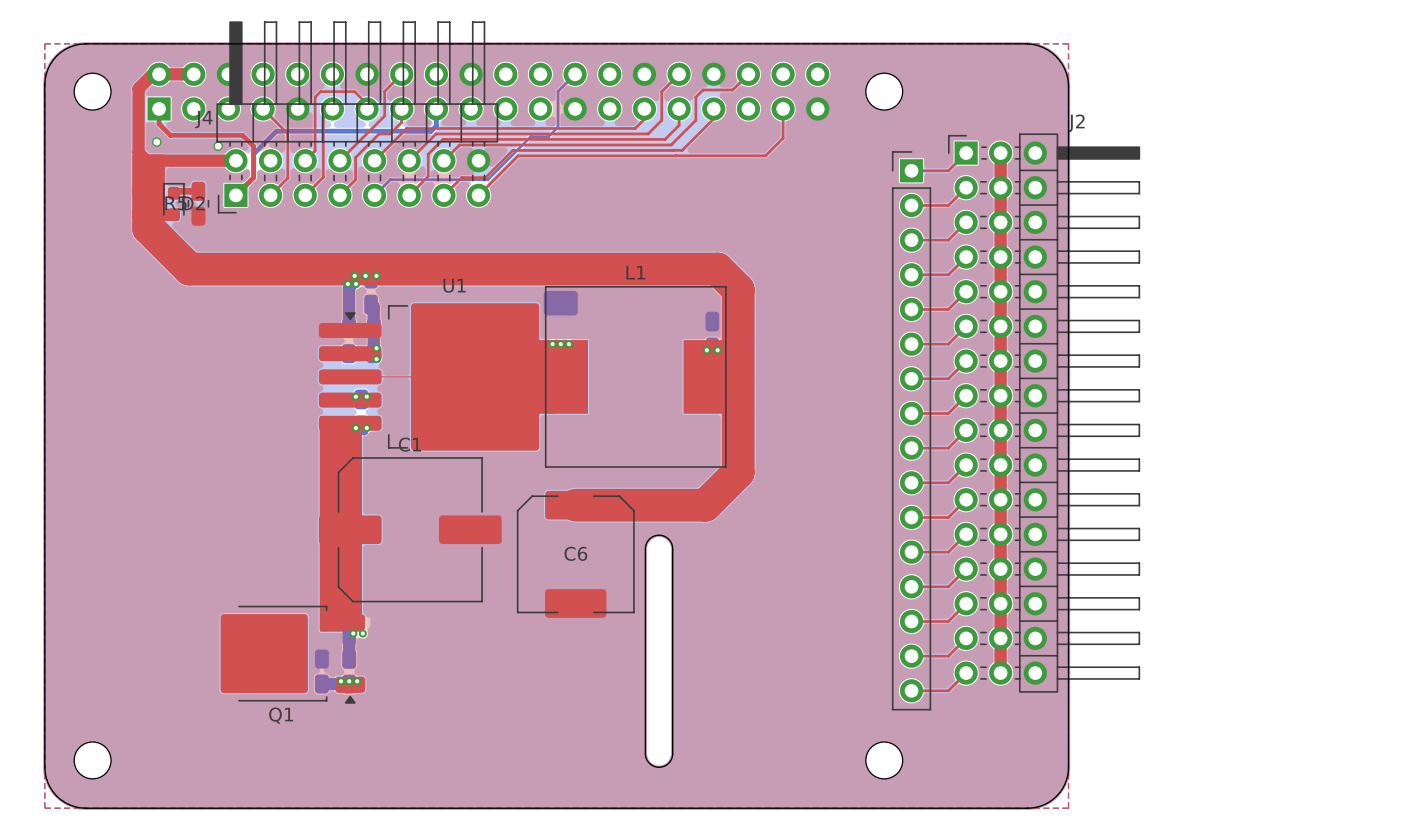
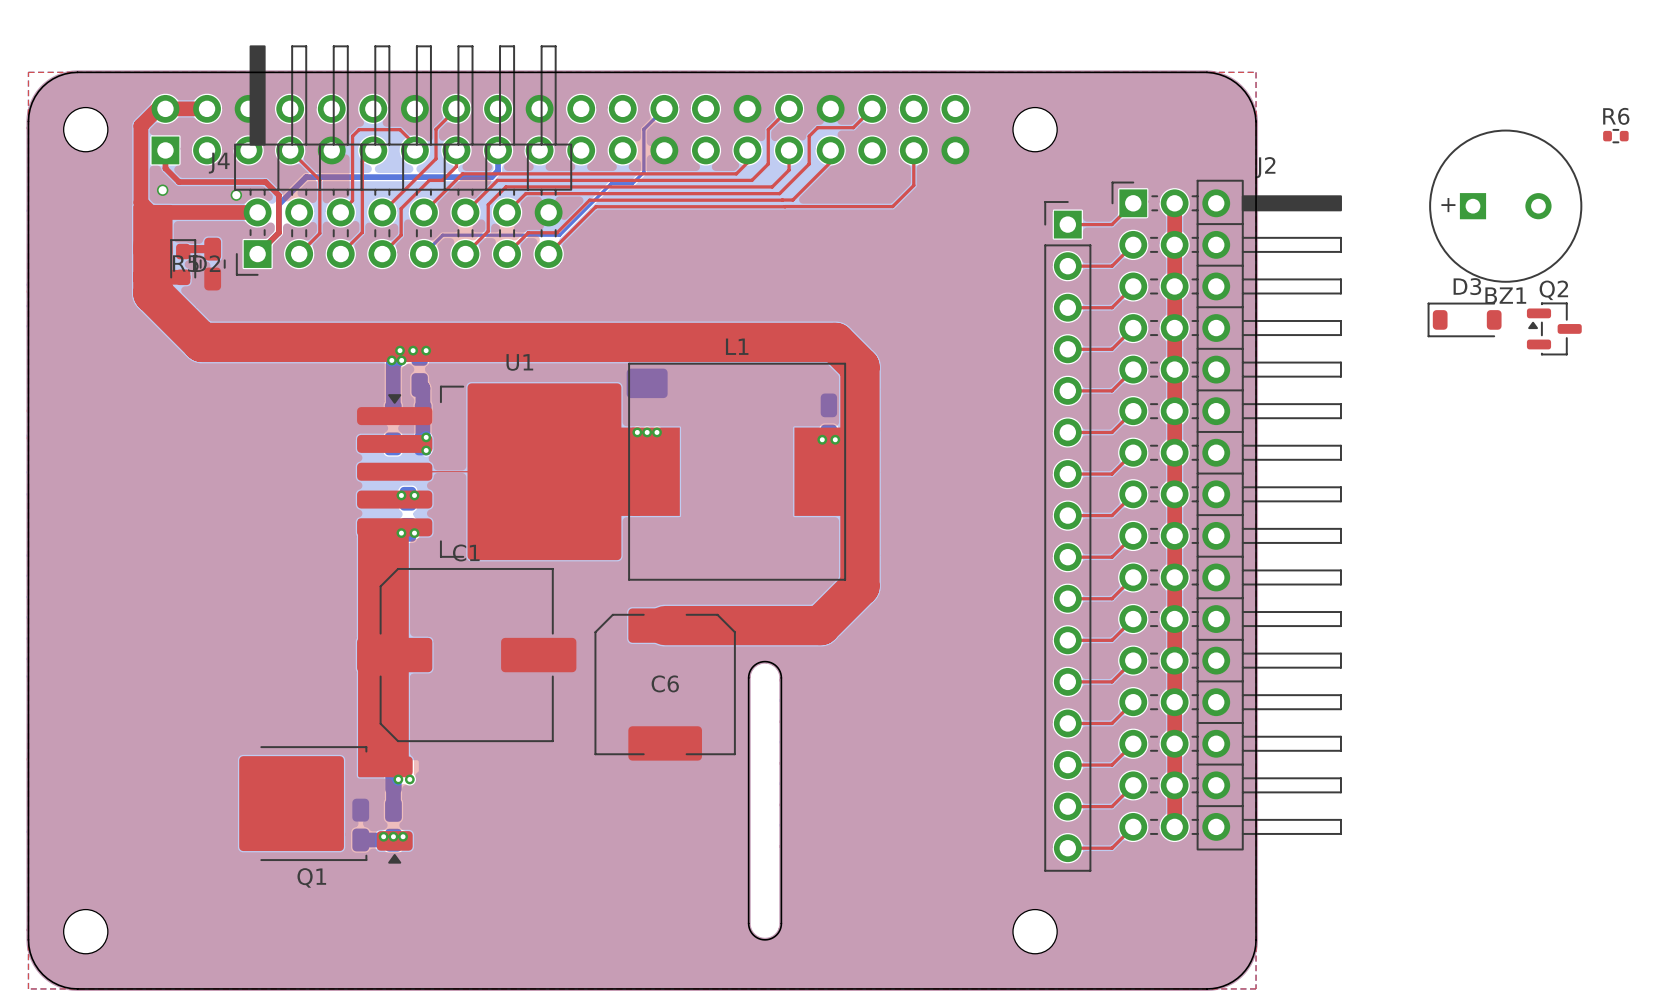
R6: none -> (1615, 136)
BZ1: none -> (1505, 206)
D3: none -> (1464, 319)
Q2: none -> (1554, 328)

